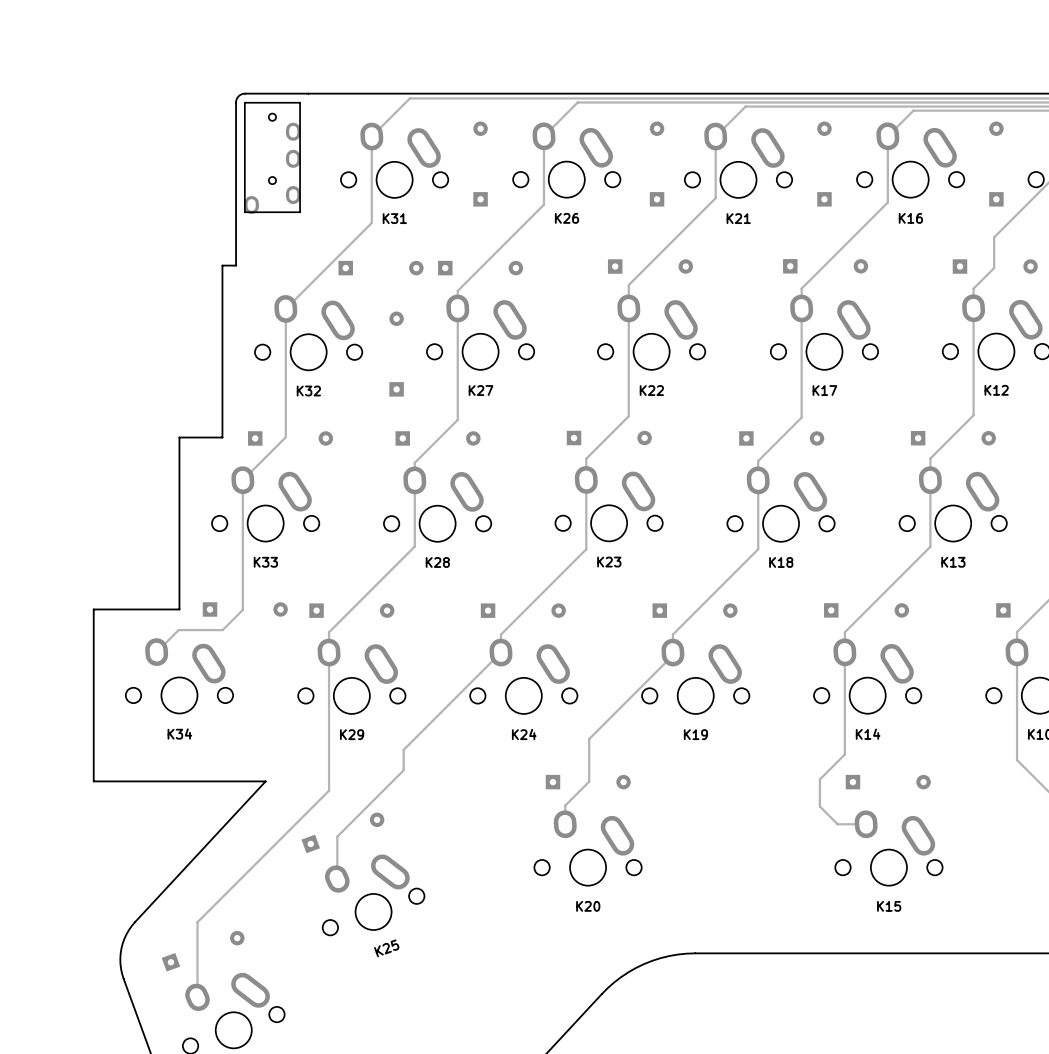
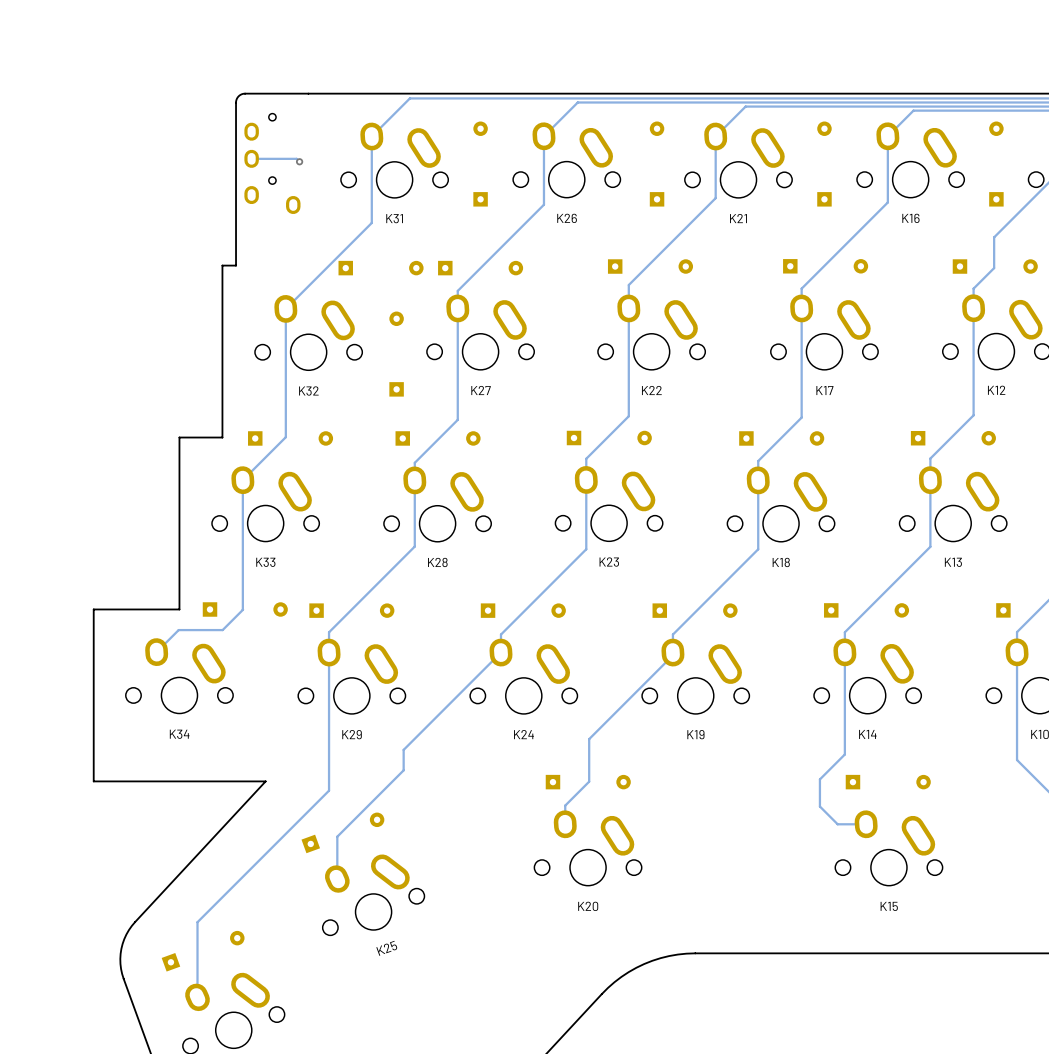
track: none -> (251, 158) (296, 158) (299, 161)
part side: bottom (272, 158) -> top (272, 163)
via: none -> (299, 161)

